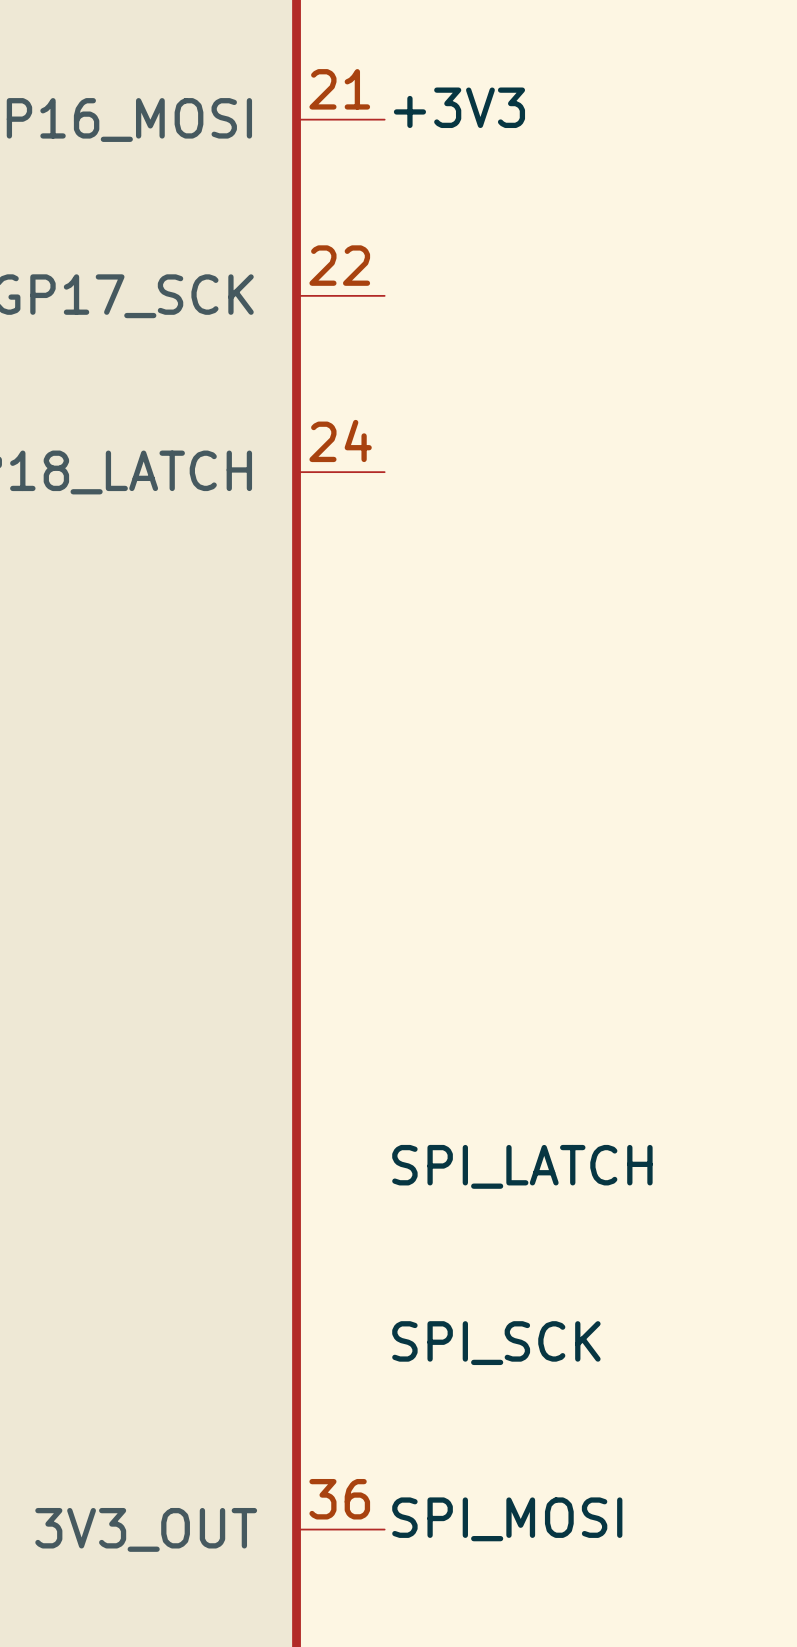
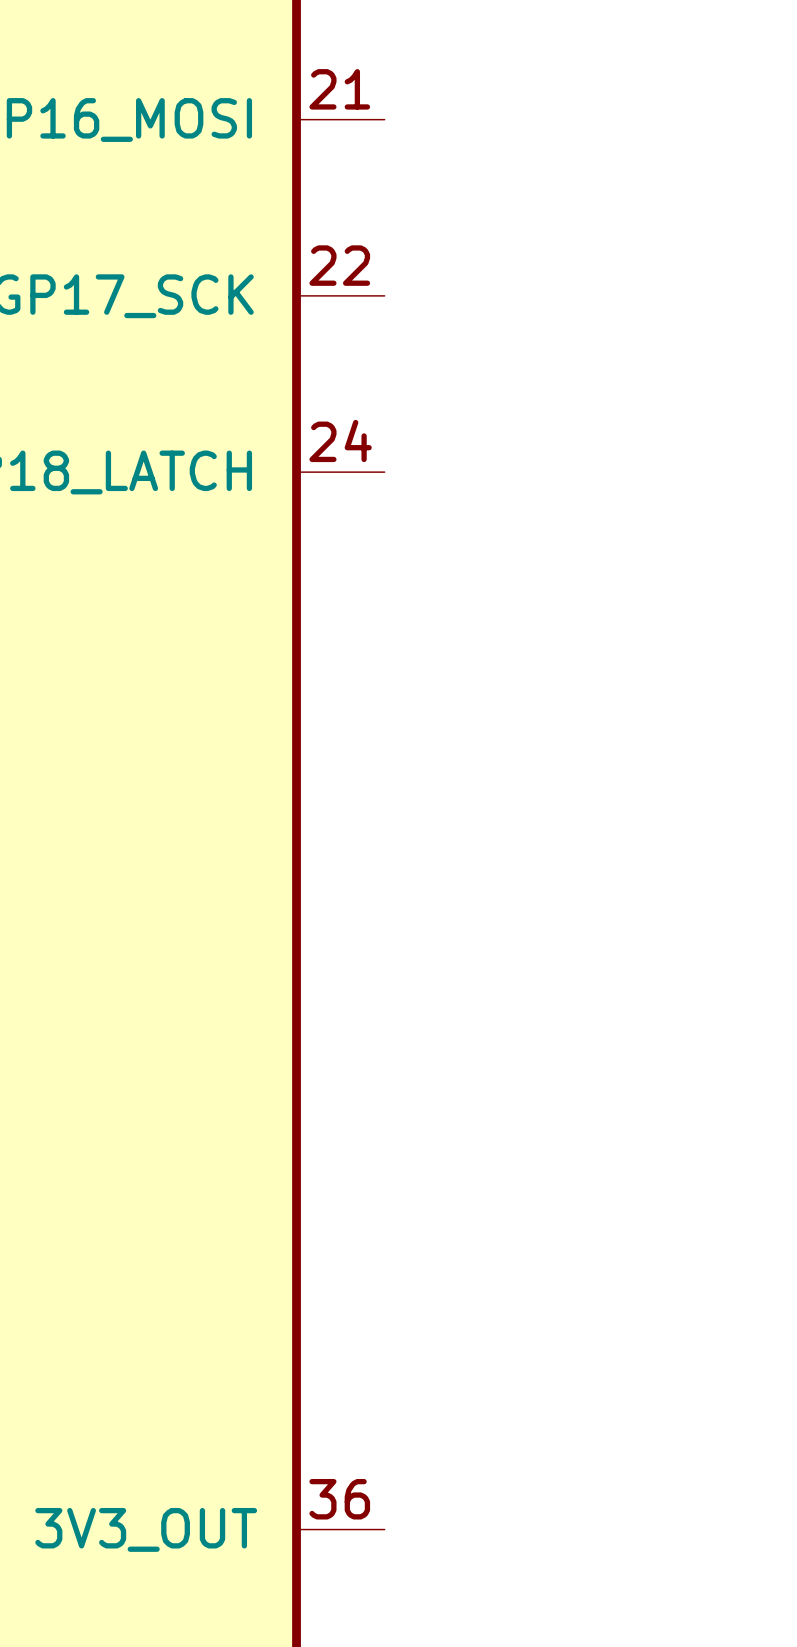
label: +3V3 (459, 107) -> none
label: SPI_LATCH (522, 1166) -> none
label: SPI_SCK (496, 1343) -> none
label: SPI_MOSI (507, 1519) -> none

